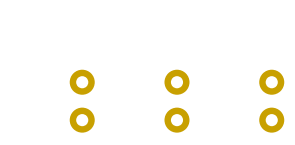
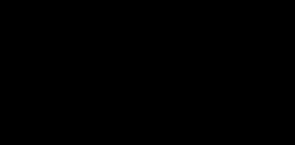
part: (82, 101) -> none
part: (176, 101) -> none
part: (271, 101) -> none

